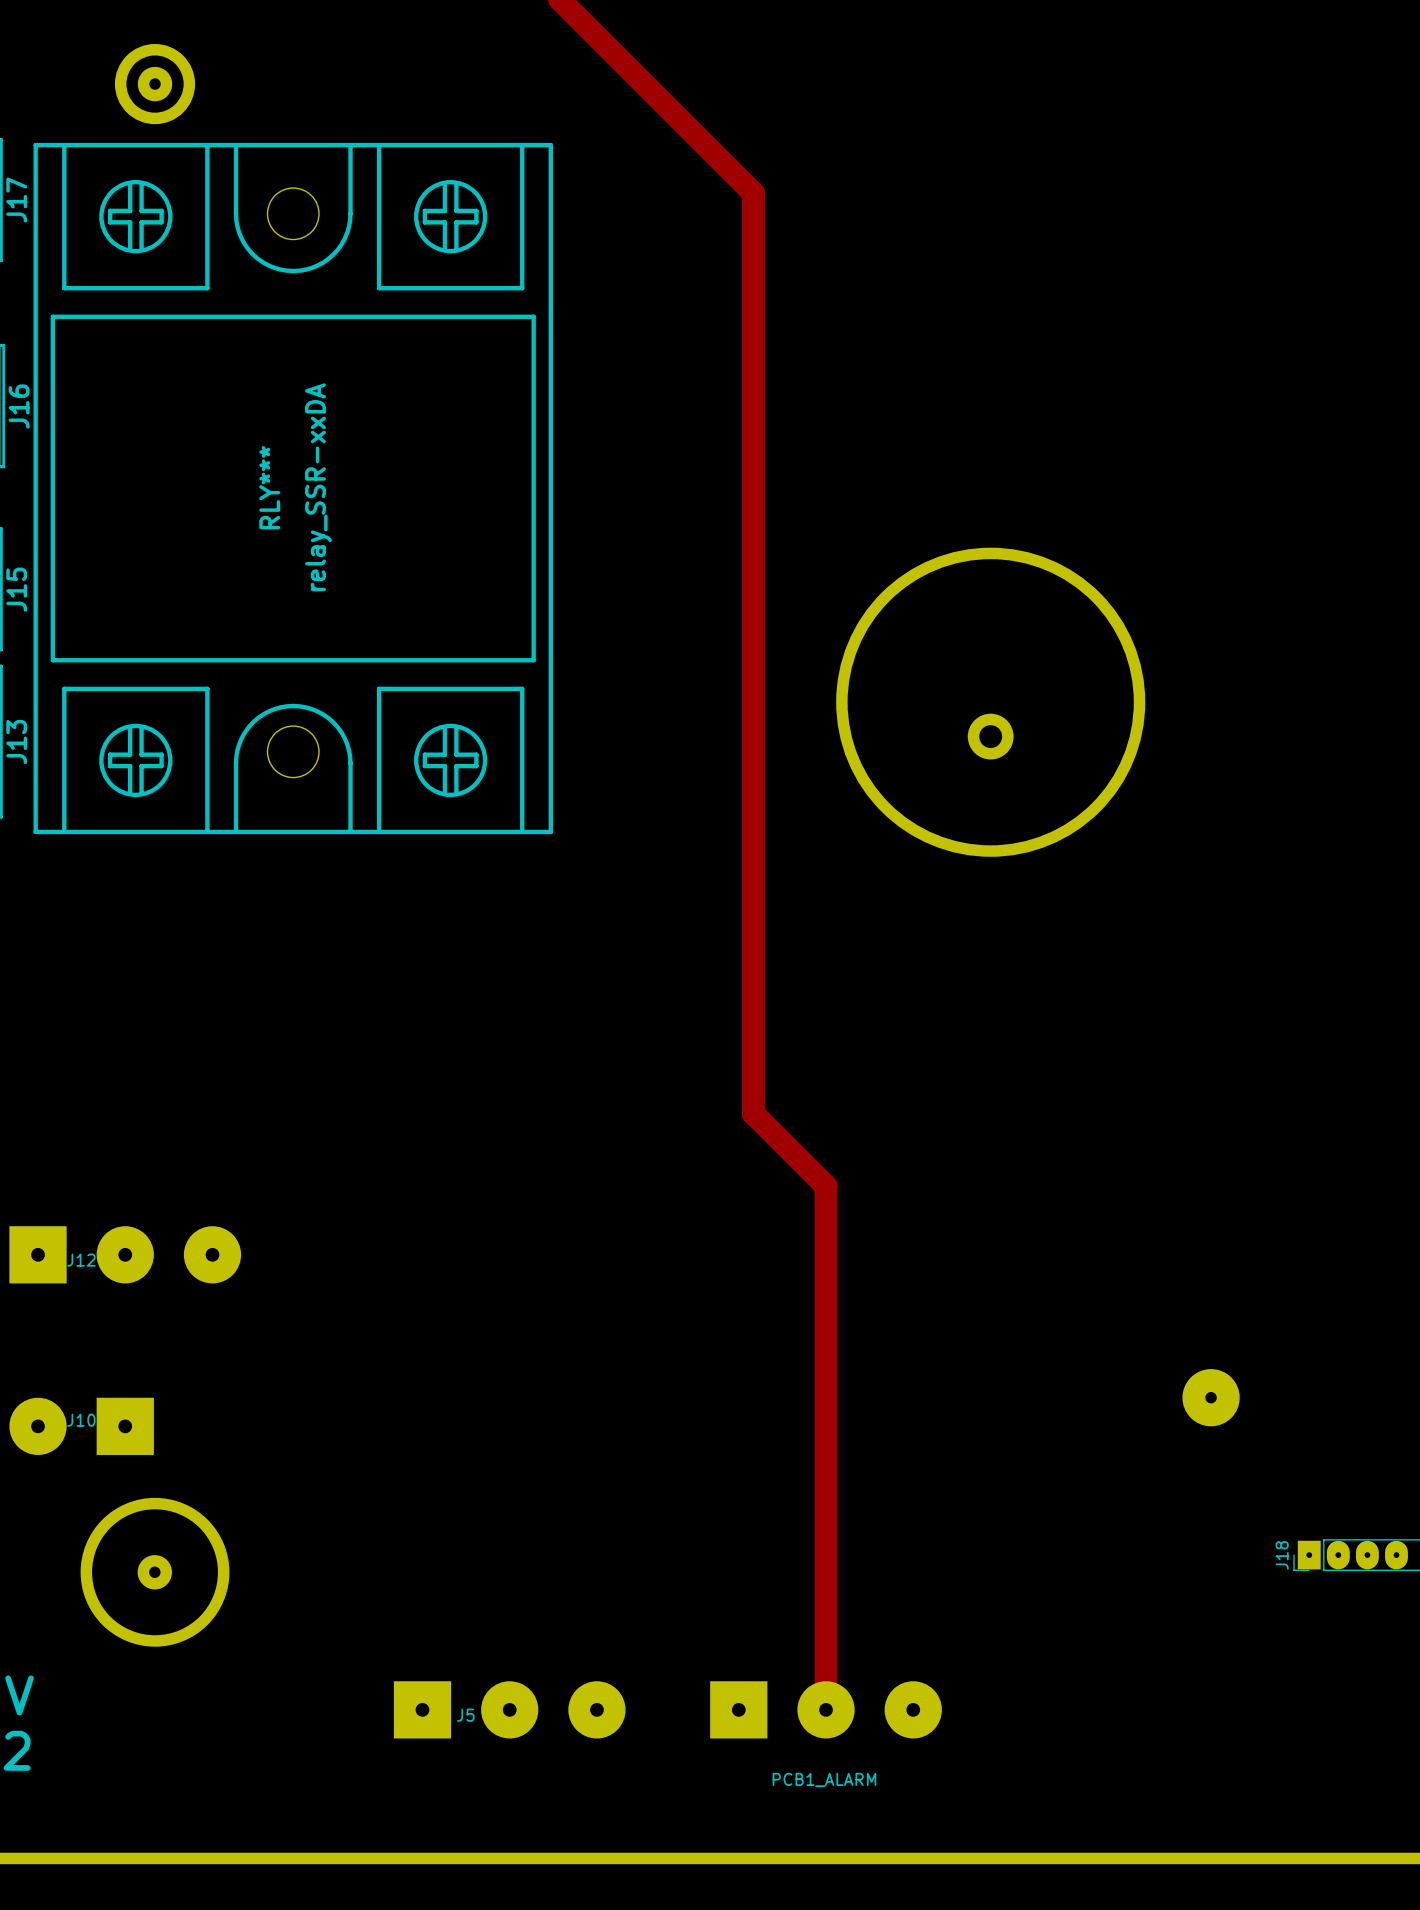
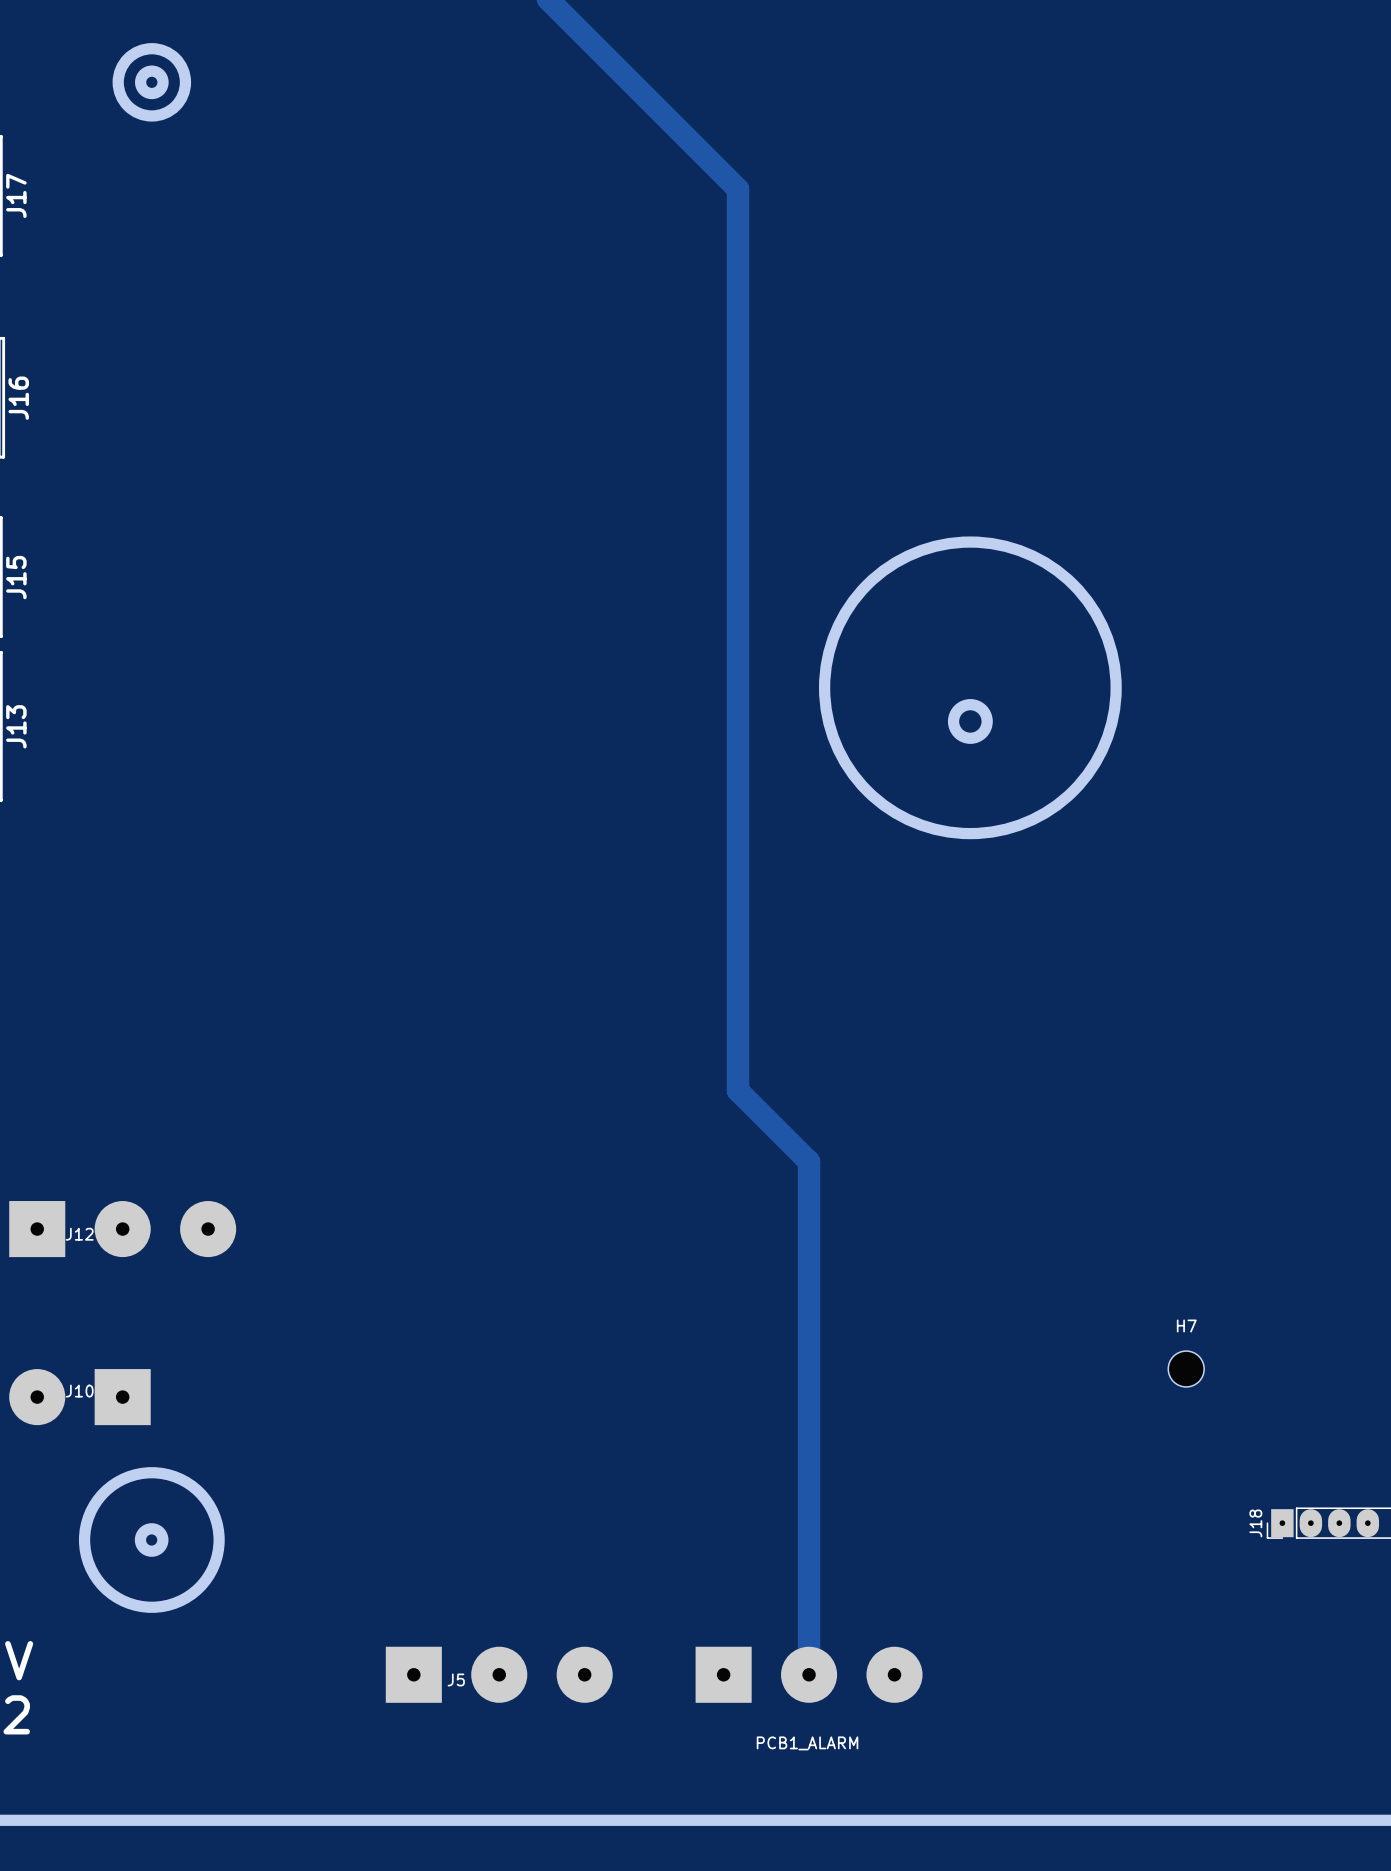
RLY***: relay_SSR-xxDA (293, 488) -> none
round board edge: [1182, 1369, 1240, 1427] -> none
round board edge: [1193, 1380, 1229, 1415] -> none
H7: none -> (1186, 1369)

